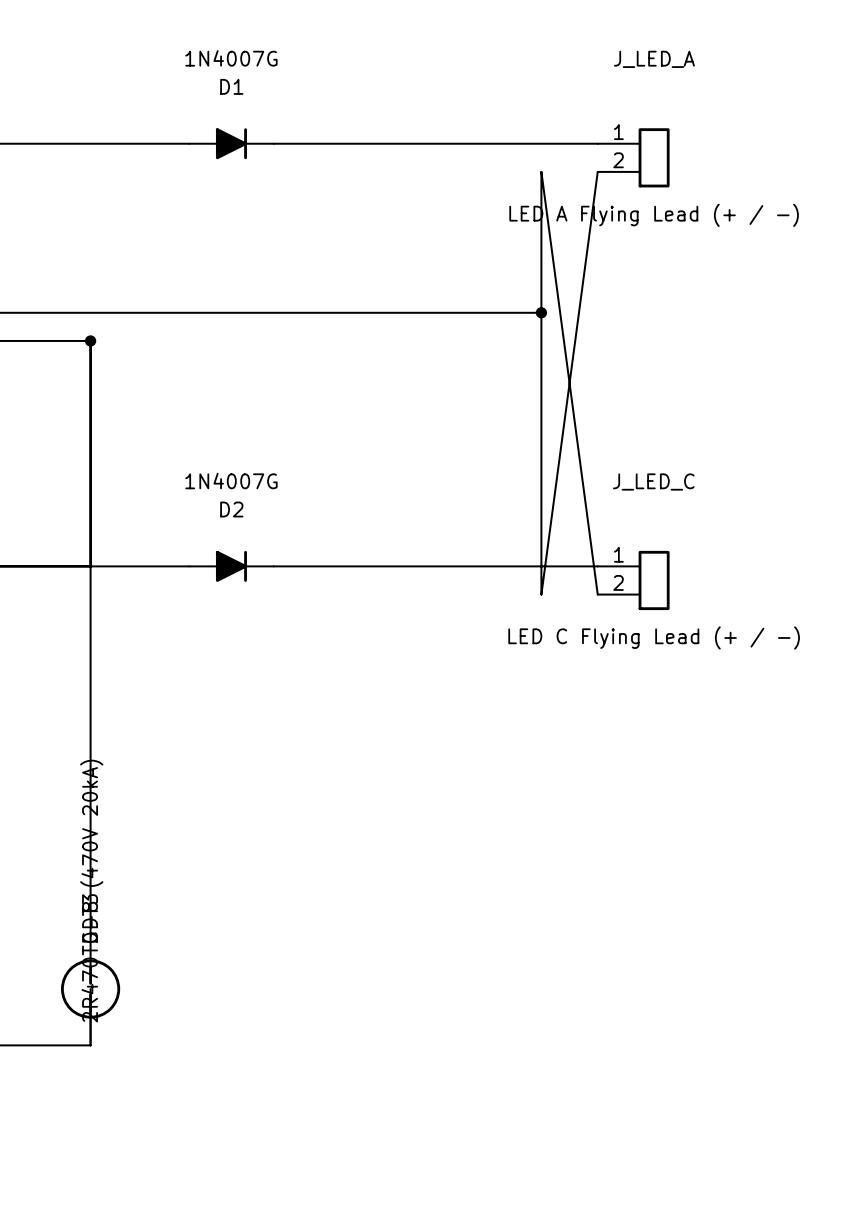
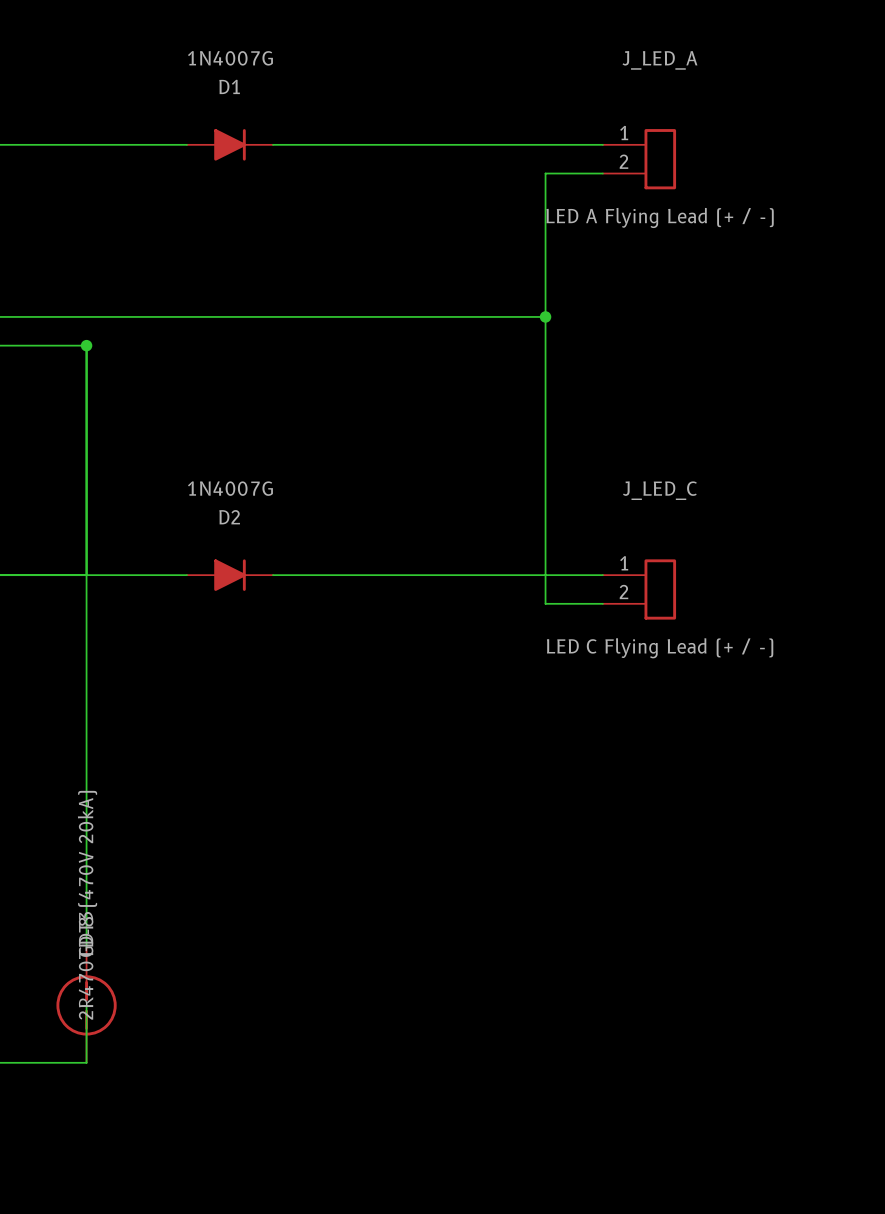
wire: (541, 171) (597, 594) -> (545, 173) (602, 173)
wire: (597, 171) (541, 594) -> (602, 603) (545, 603)

